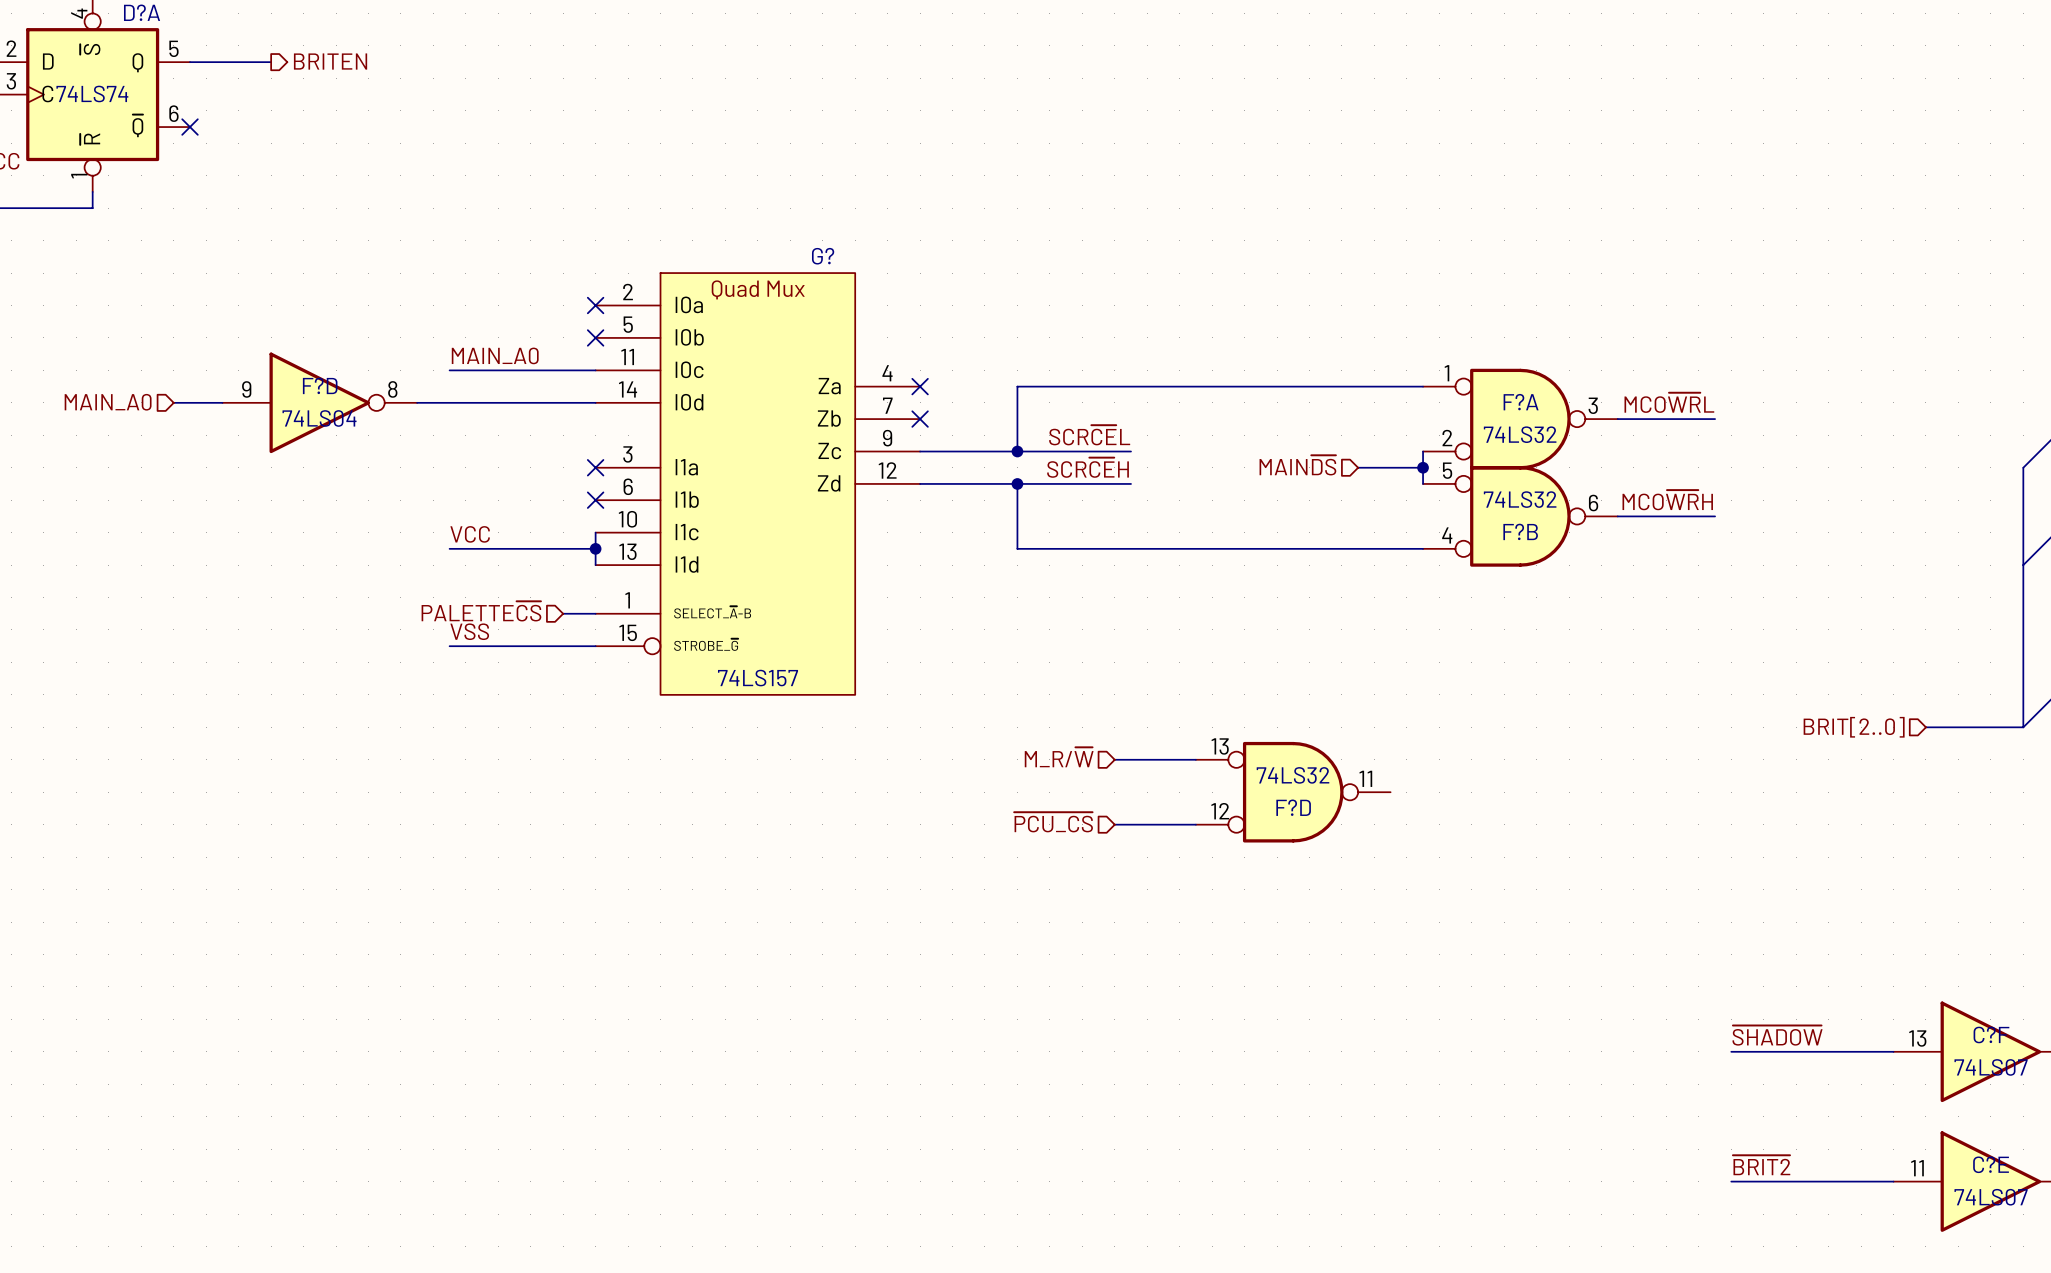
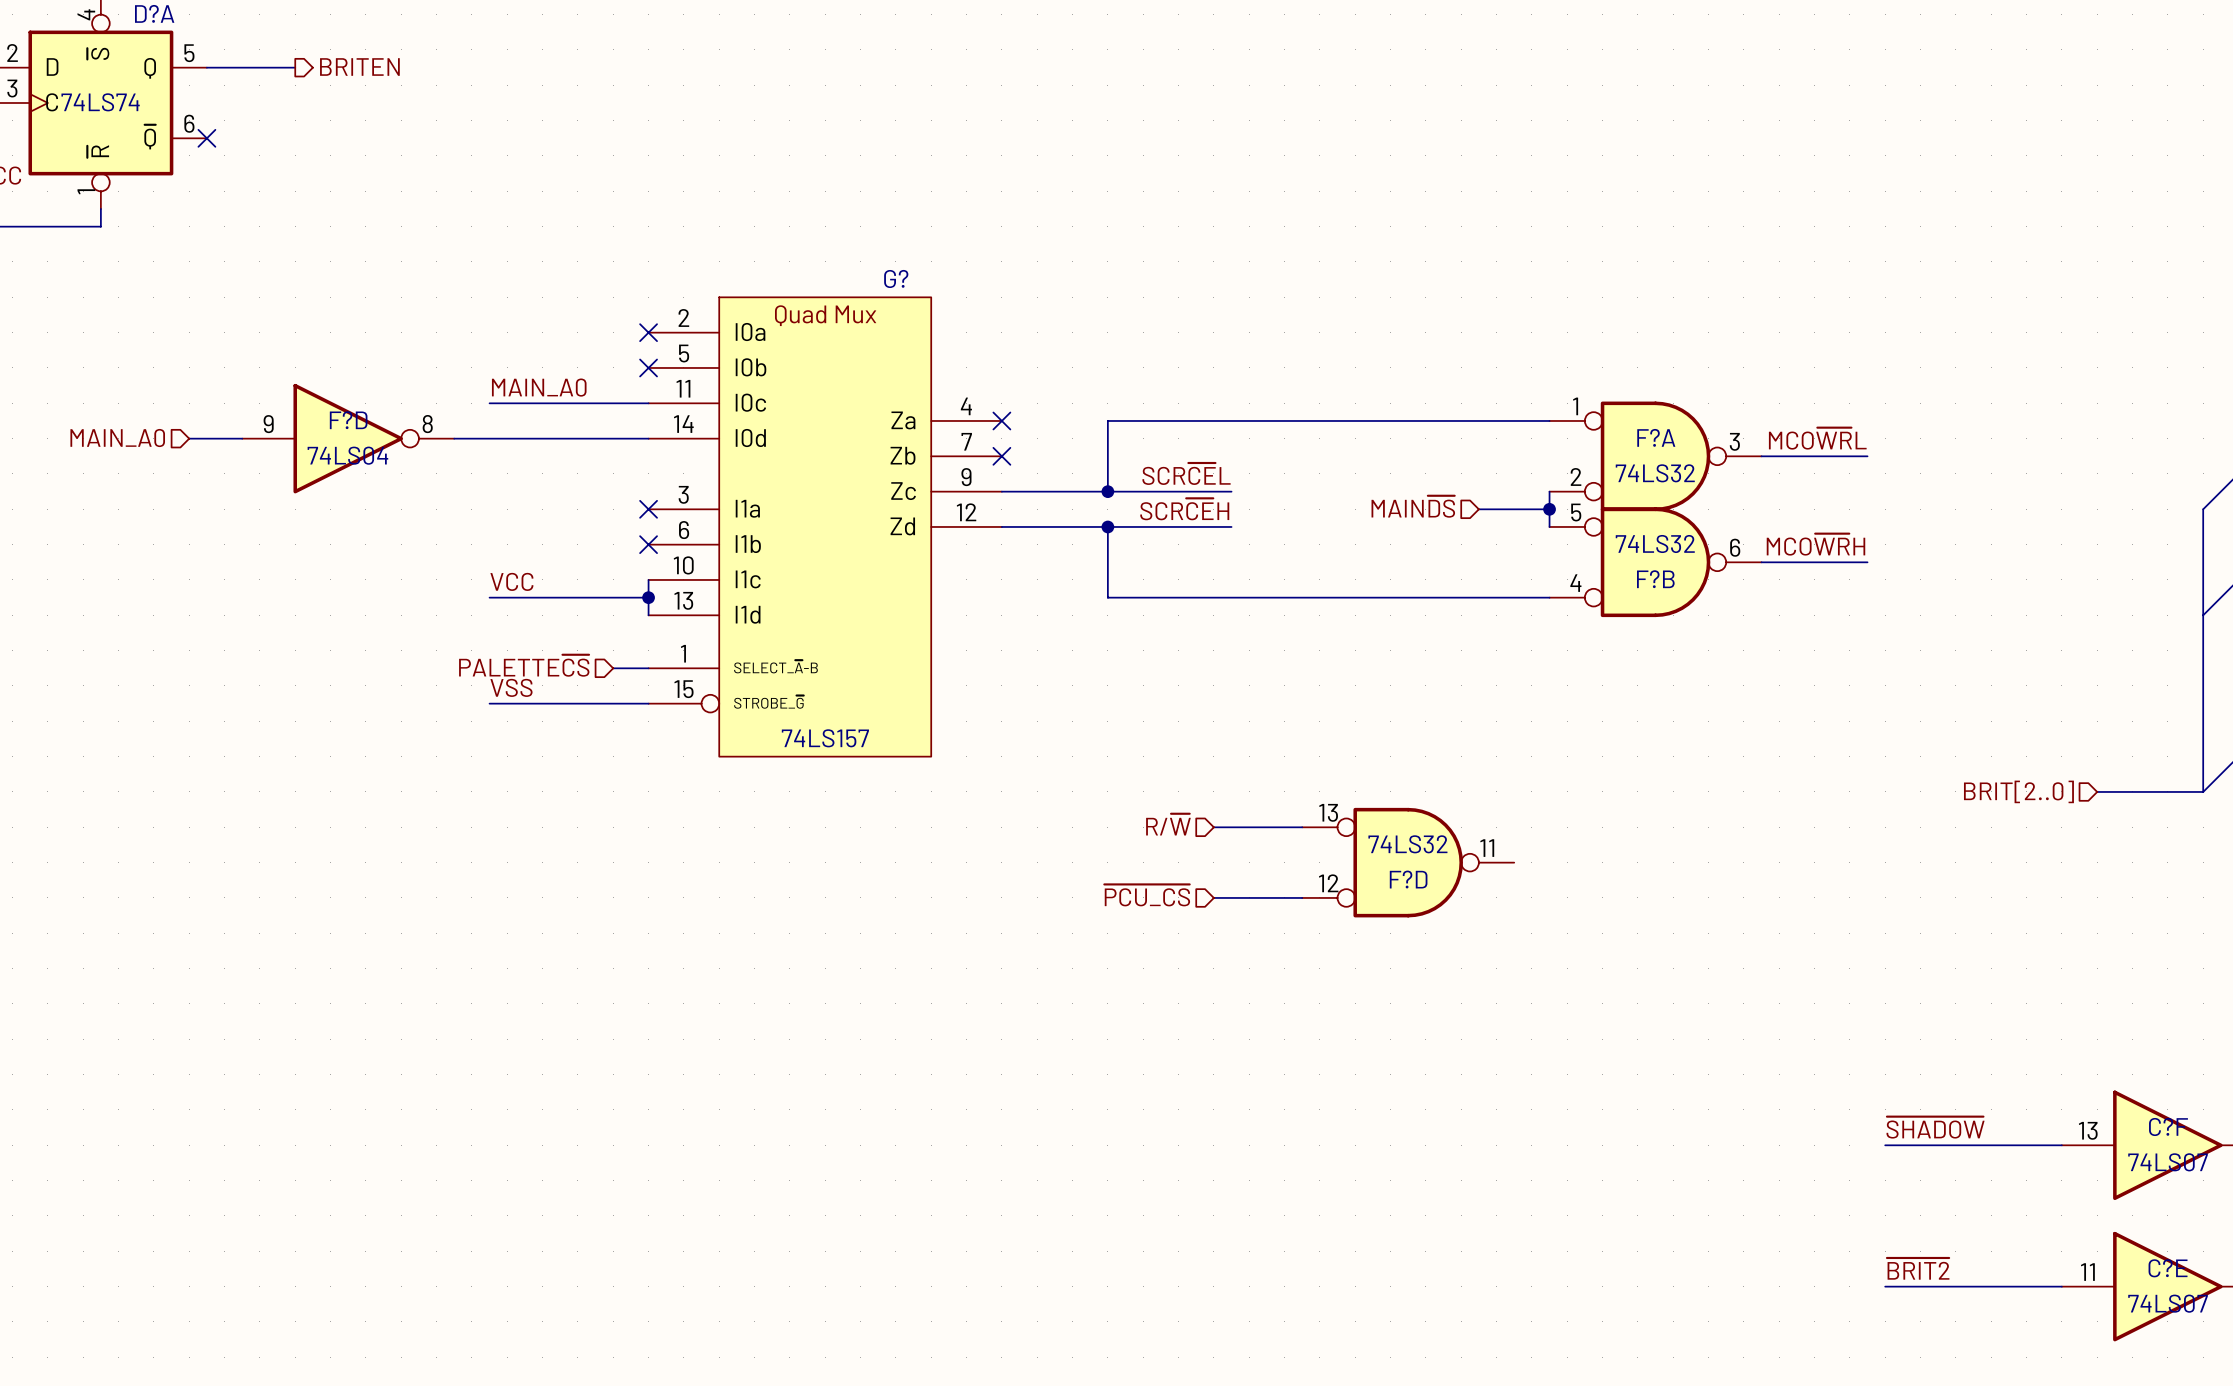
hierarchical label: M_R/~{W} (1059, 757) -> R/~{W} (1168, 824)

